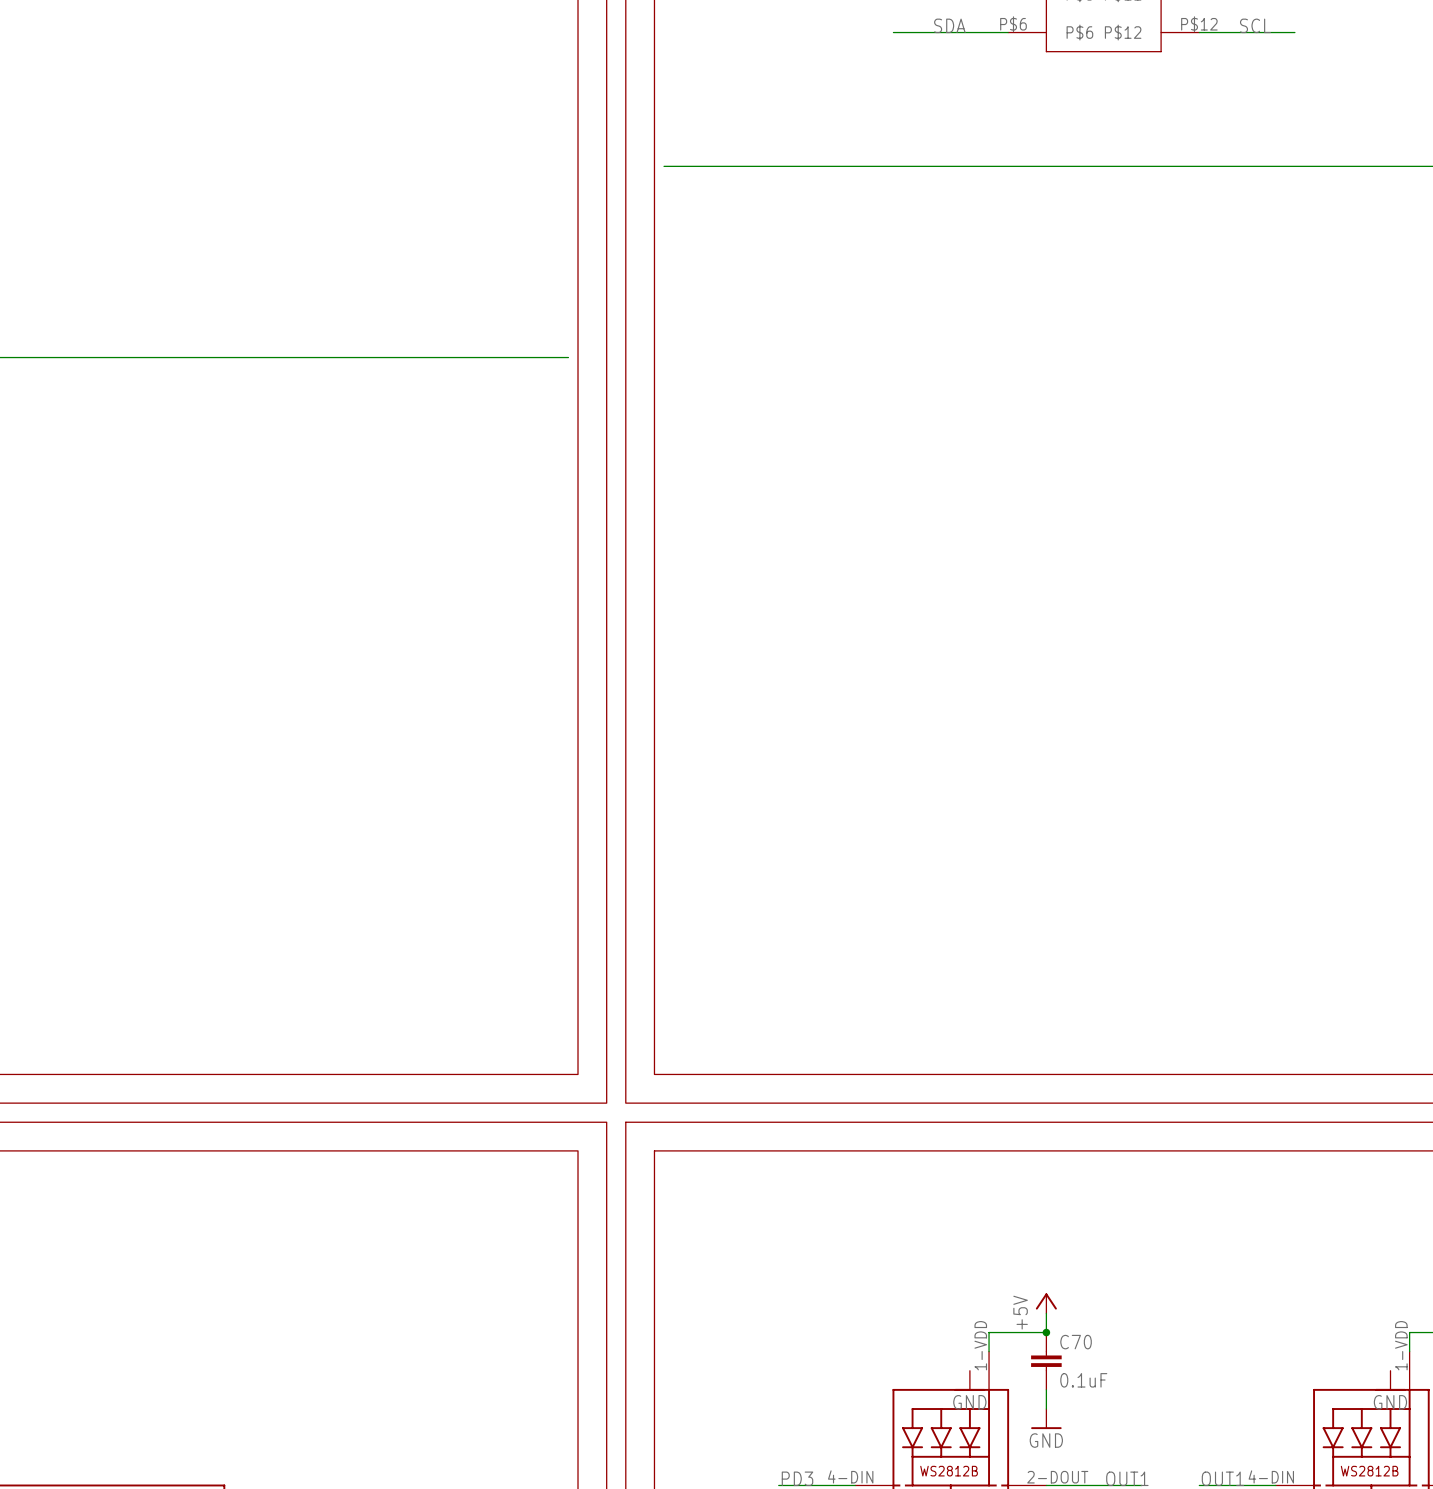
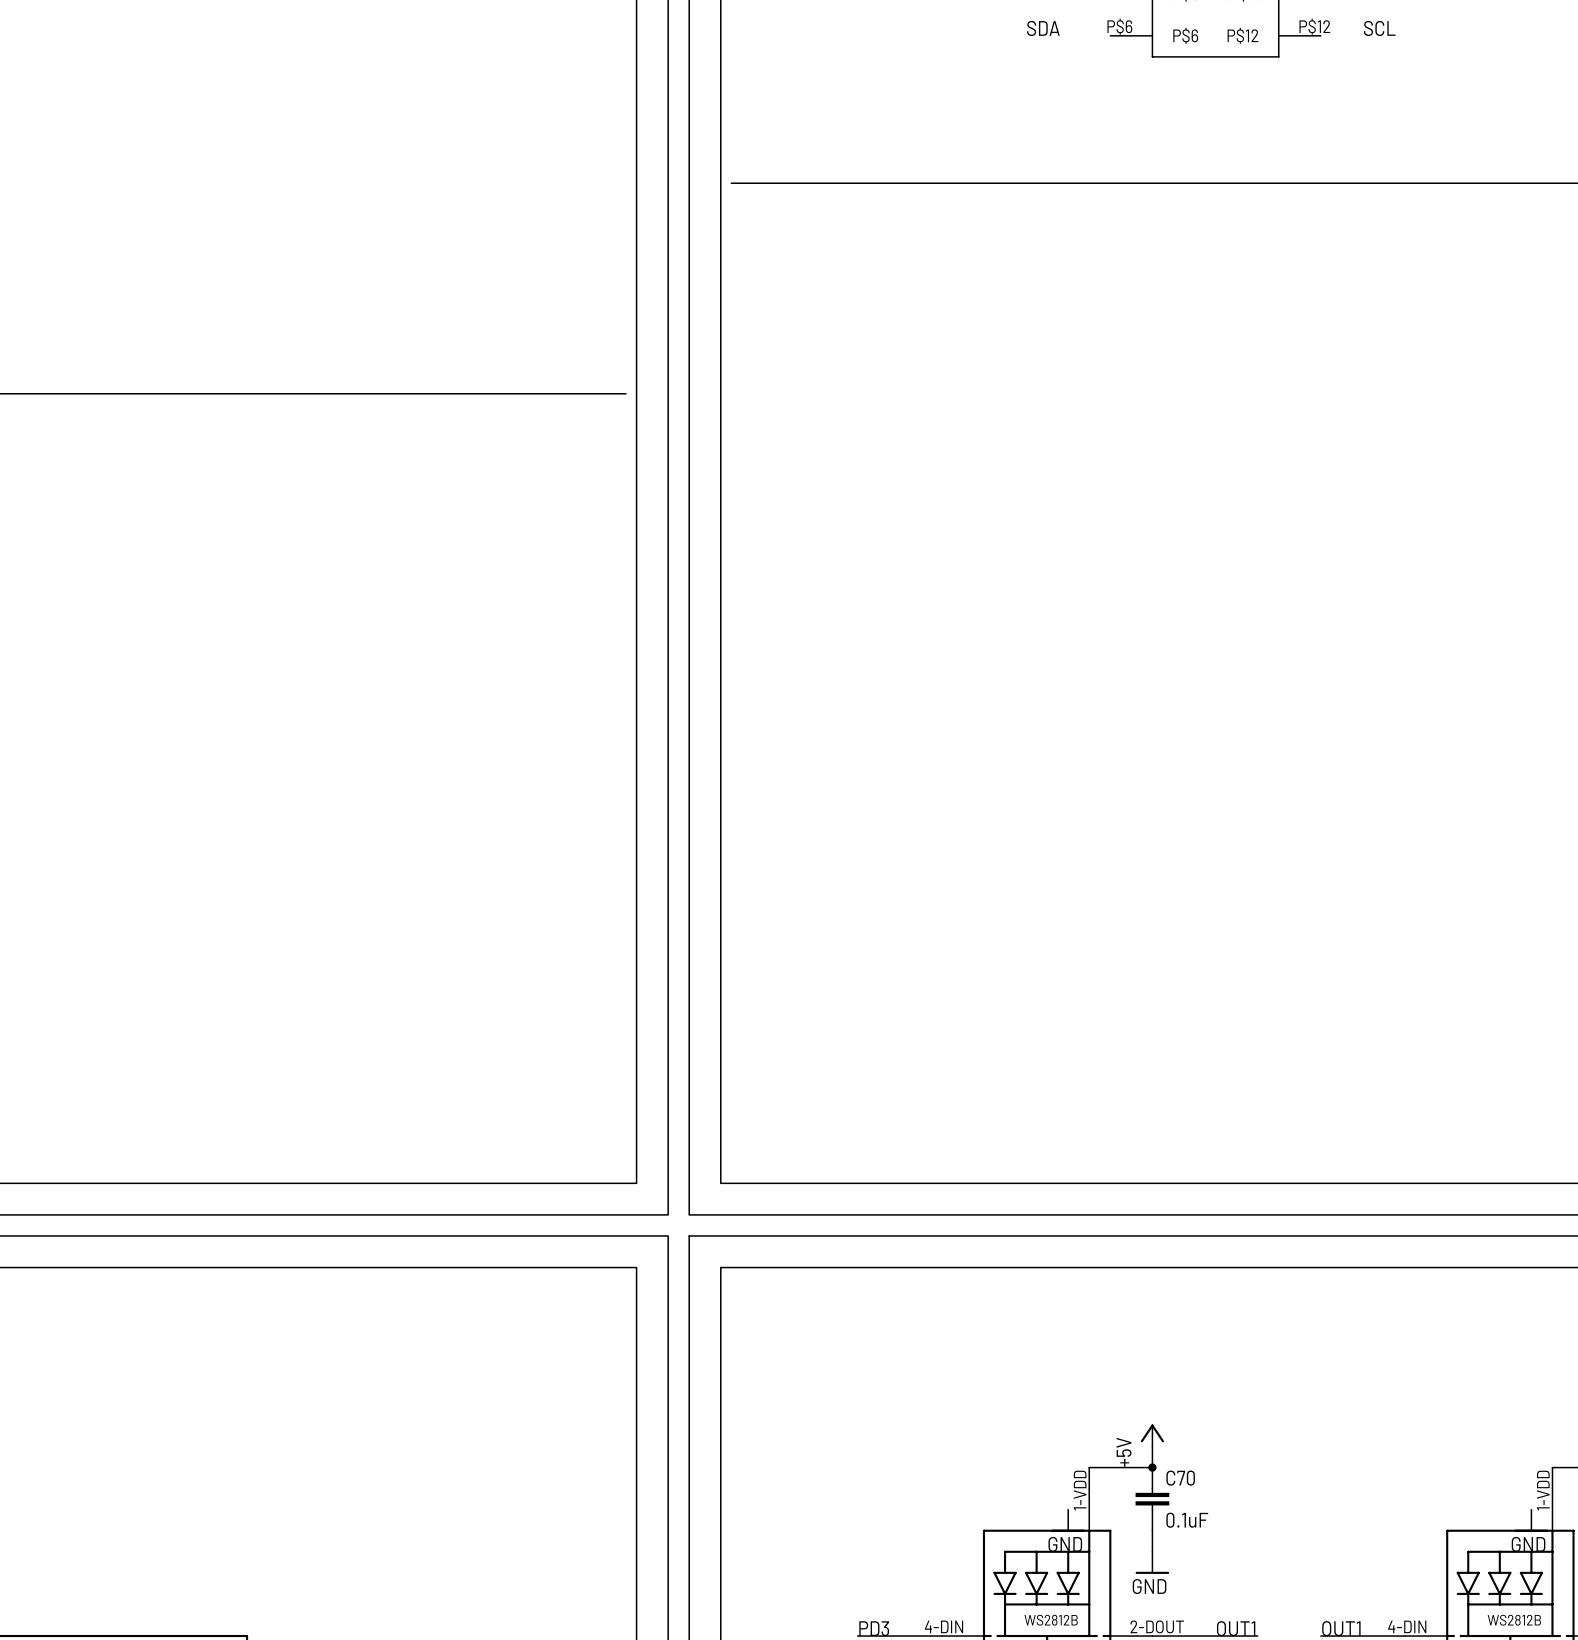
wire: (893, 32) (1008, 32) -> none
wire: (1199, 32) (1294, 32) -> none

